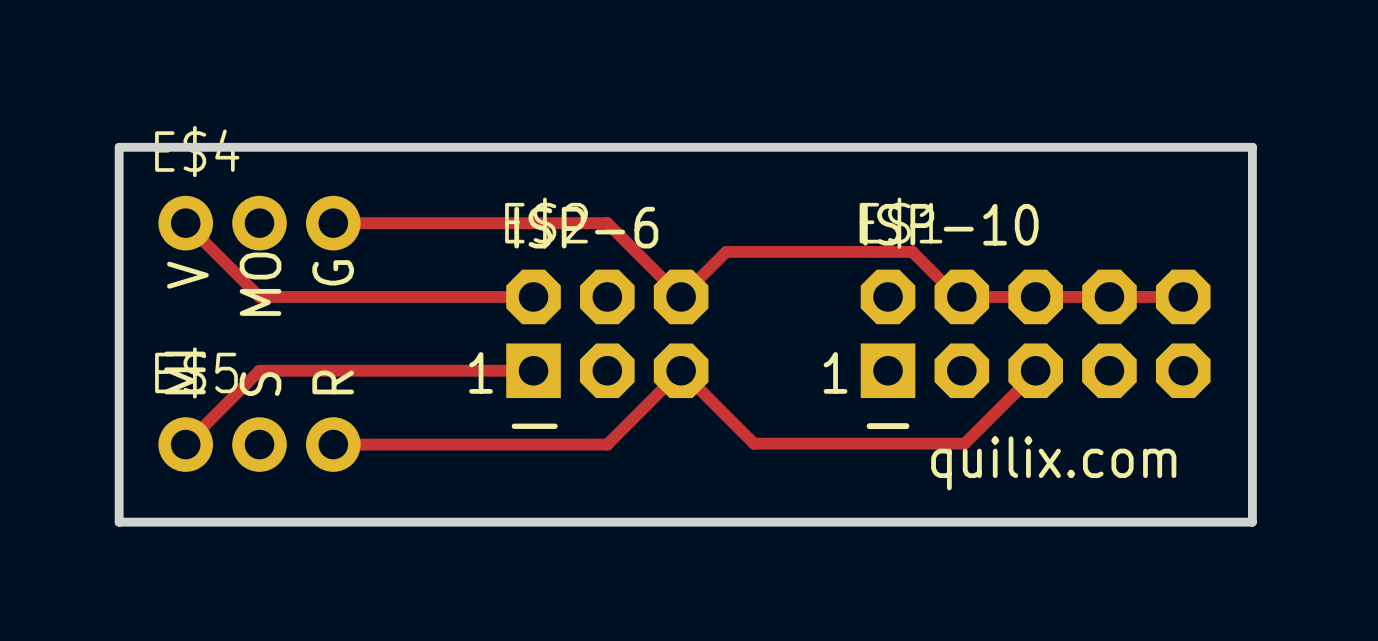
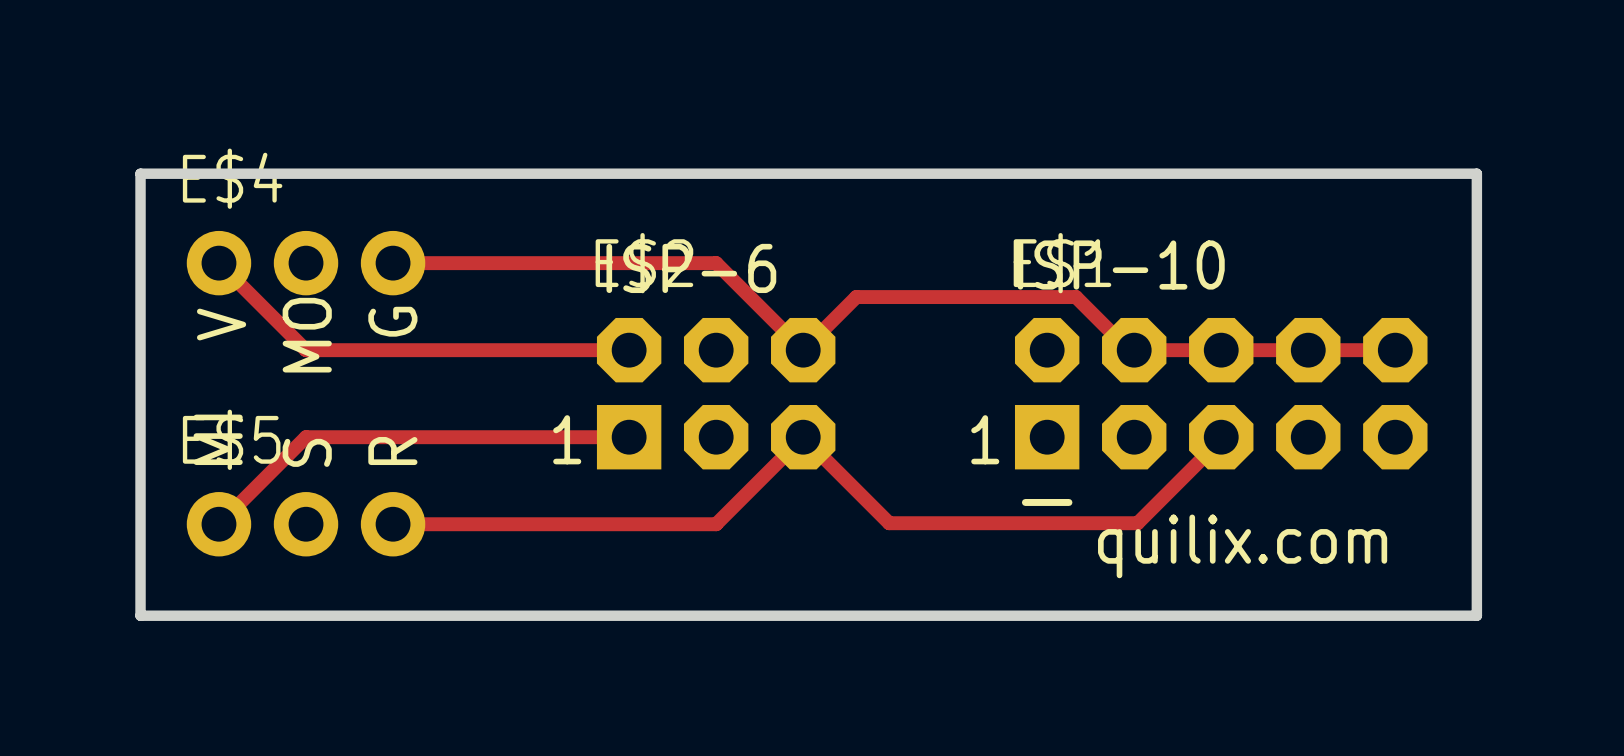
line: (514, 426) (555, 426) -> none

